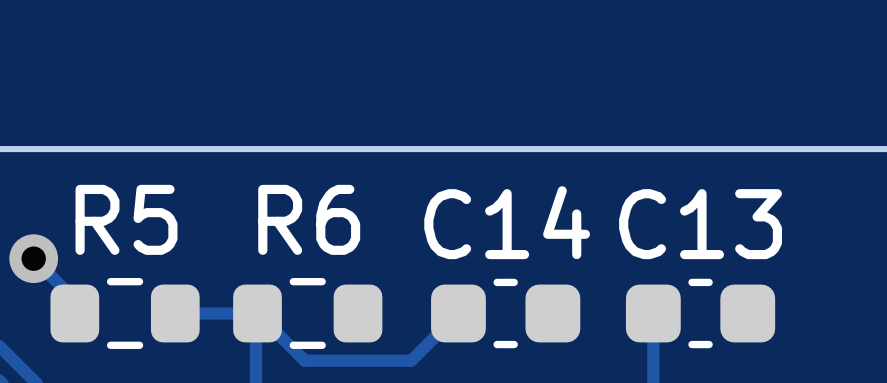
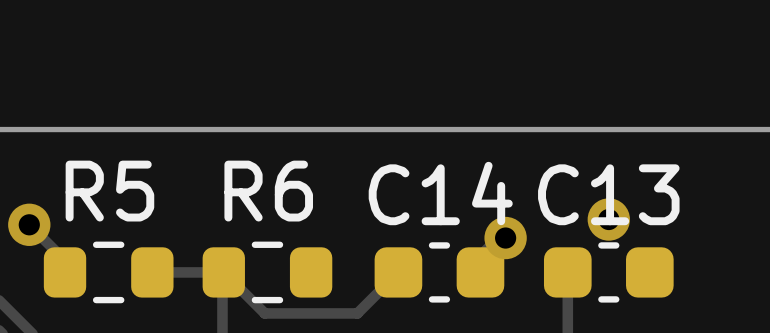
via: none -> (608, 219)
via: none -> (505, 238)

